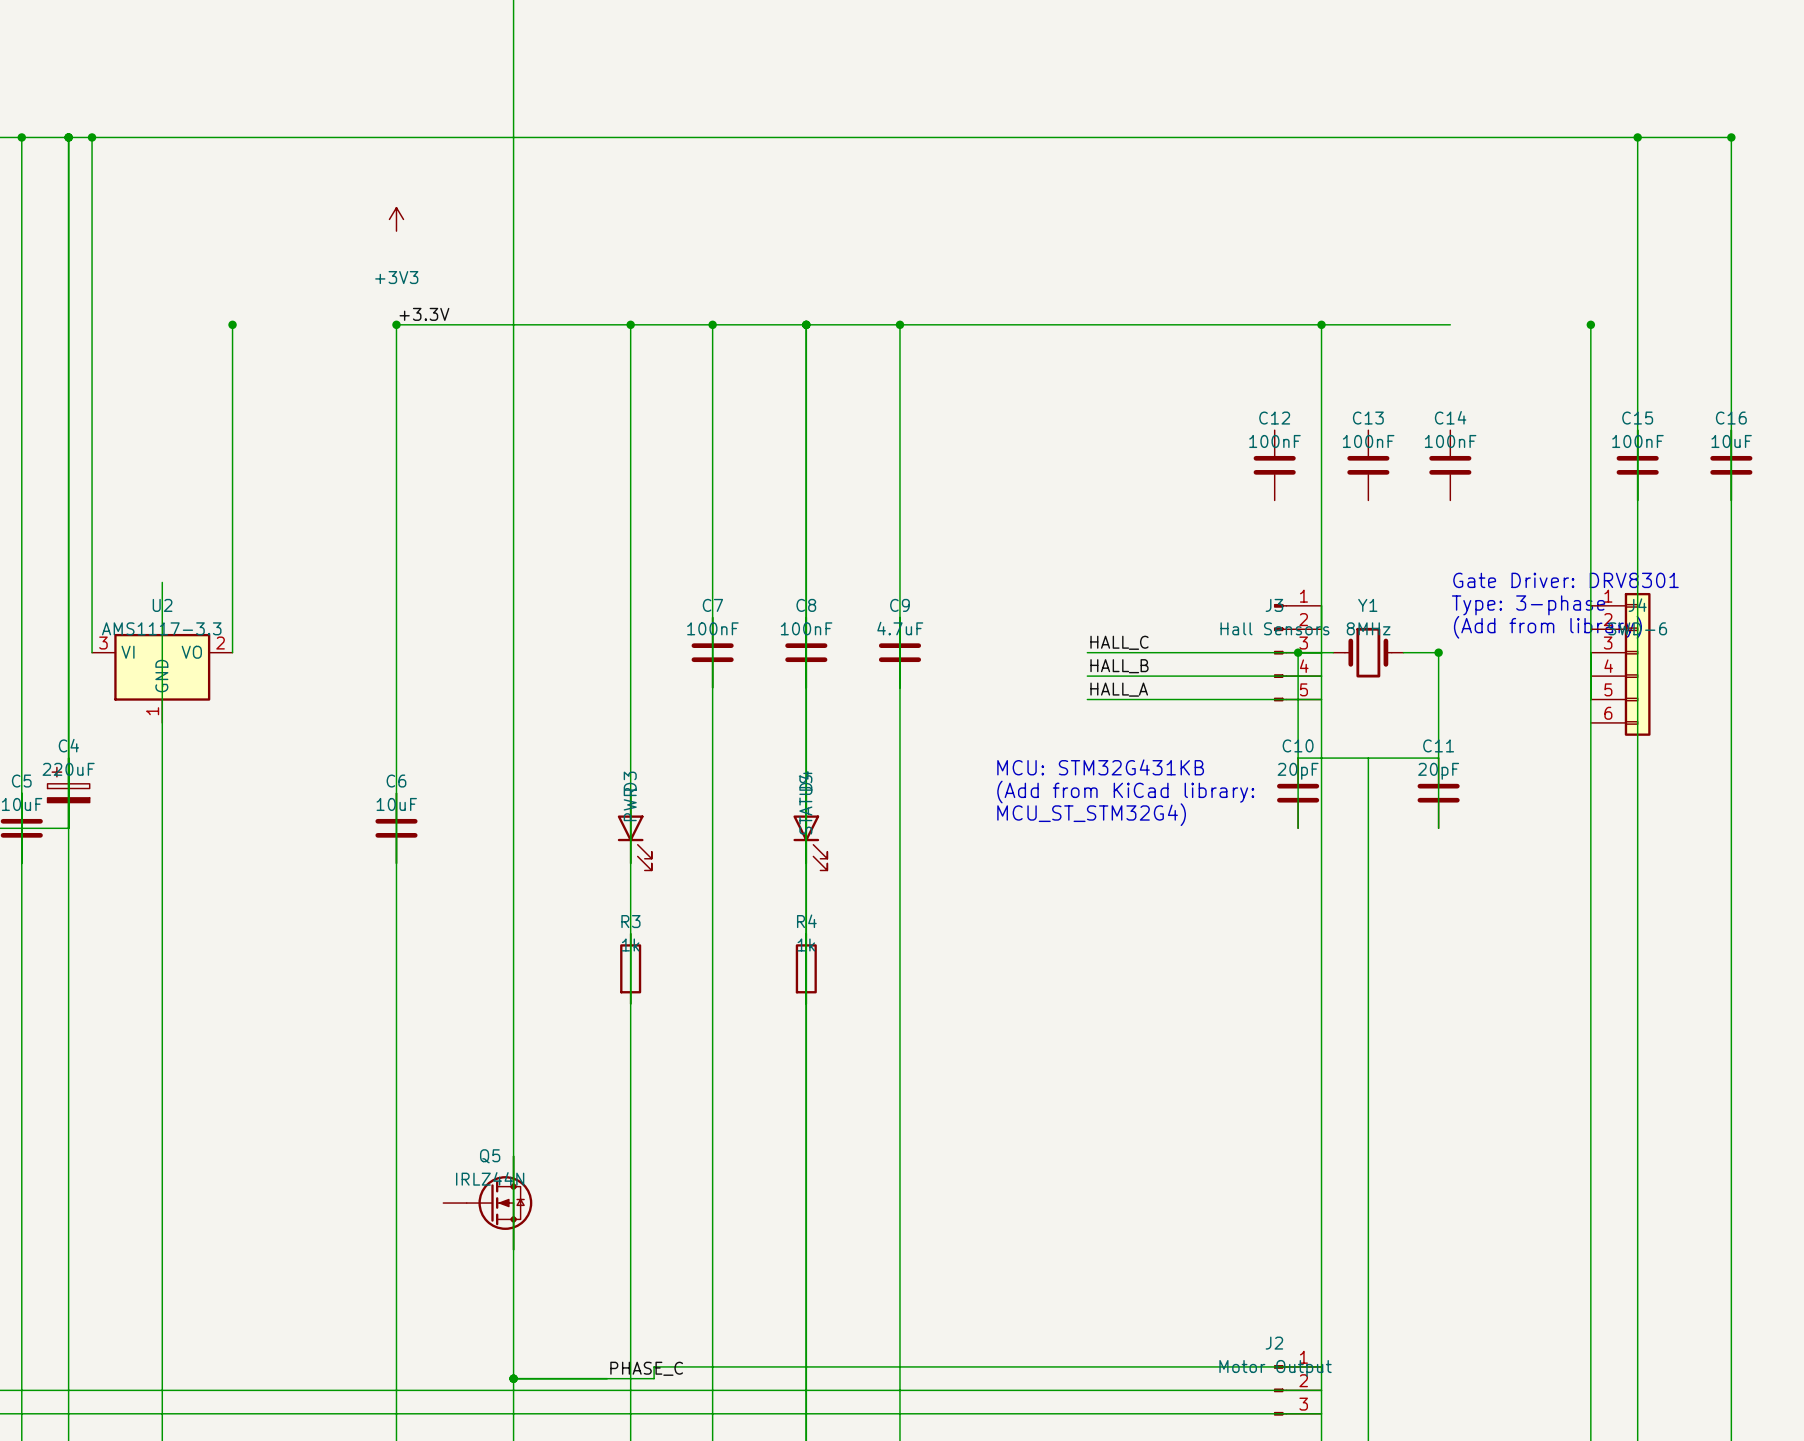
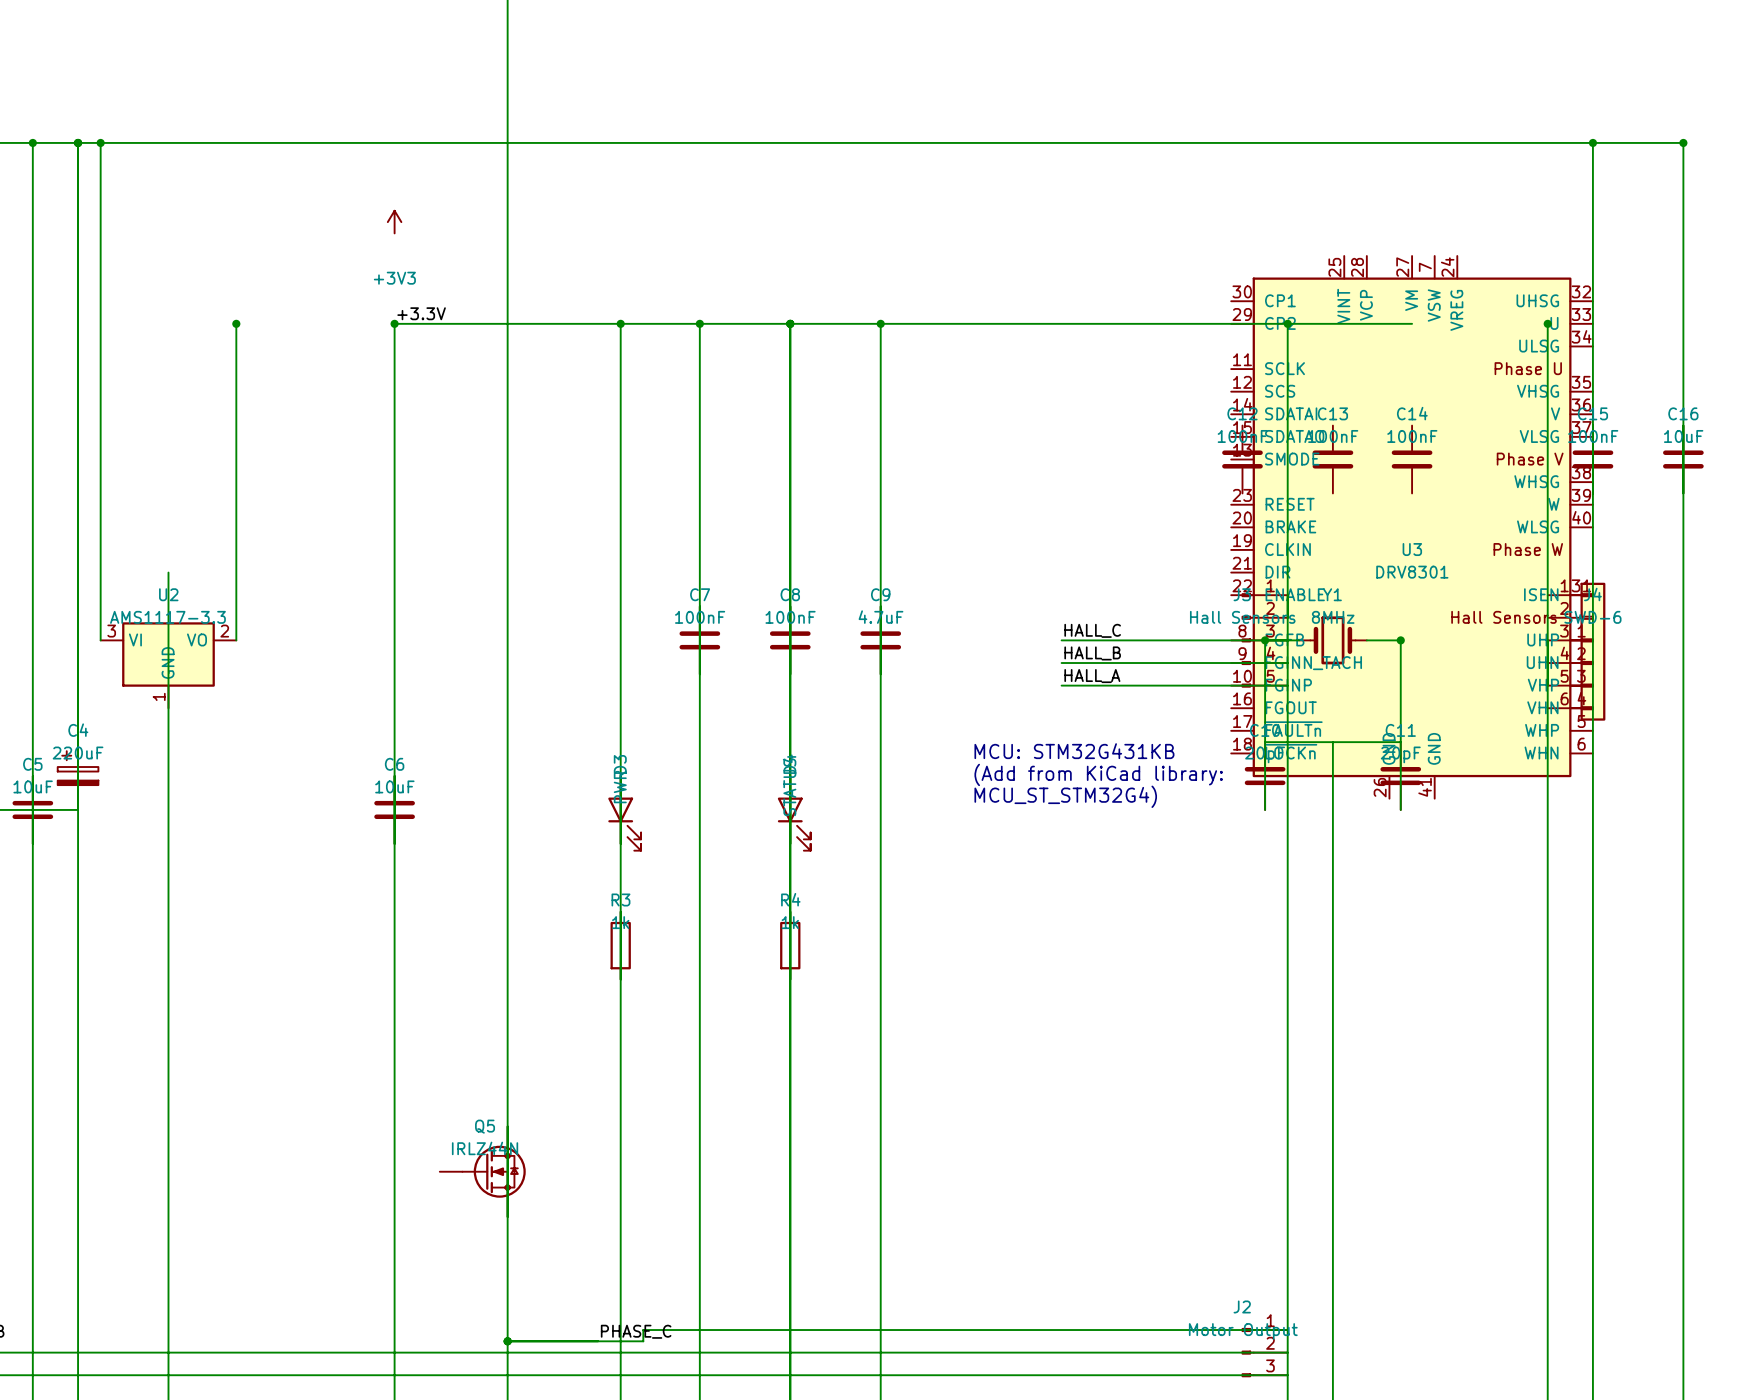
U3: none -> DRV8301 (1412, 527)
text: Gate Driver: DRV8301 (1566, 580) -> none
text: Type: 3-phase (1528, 605) -> none
text: (Add from library) (1547, 627) -> none

